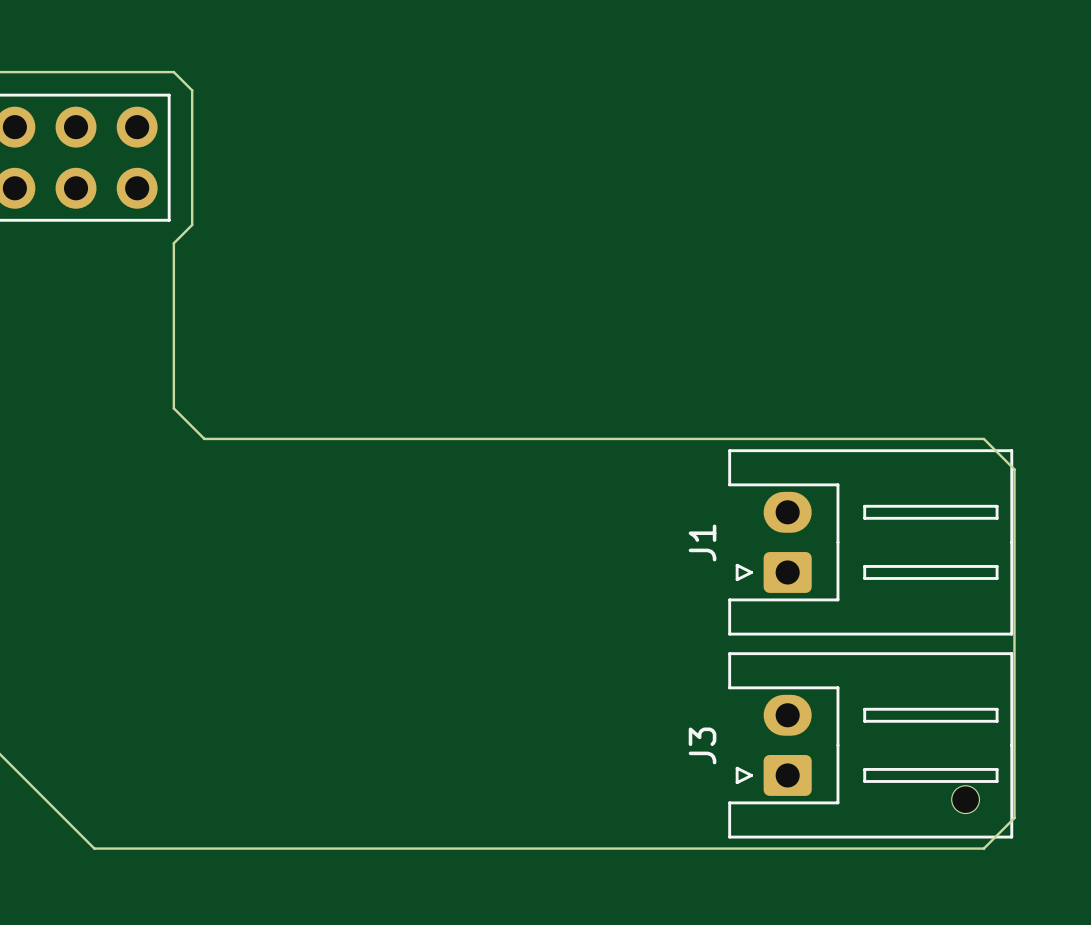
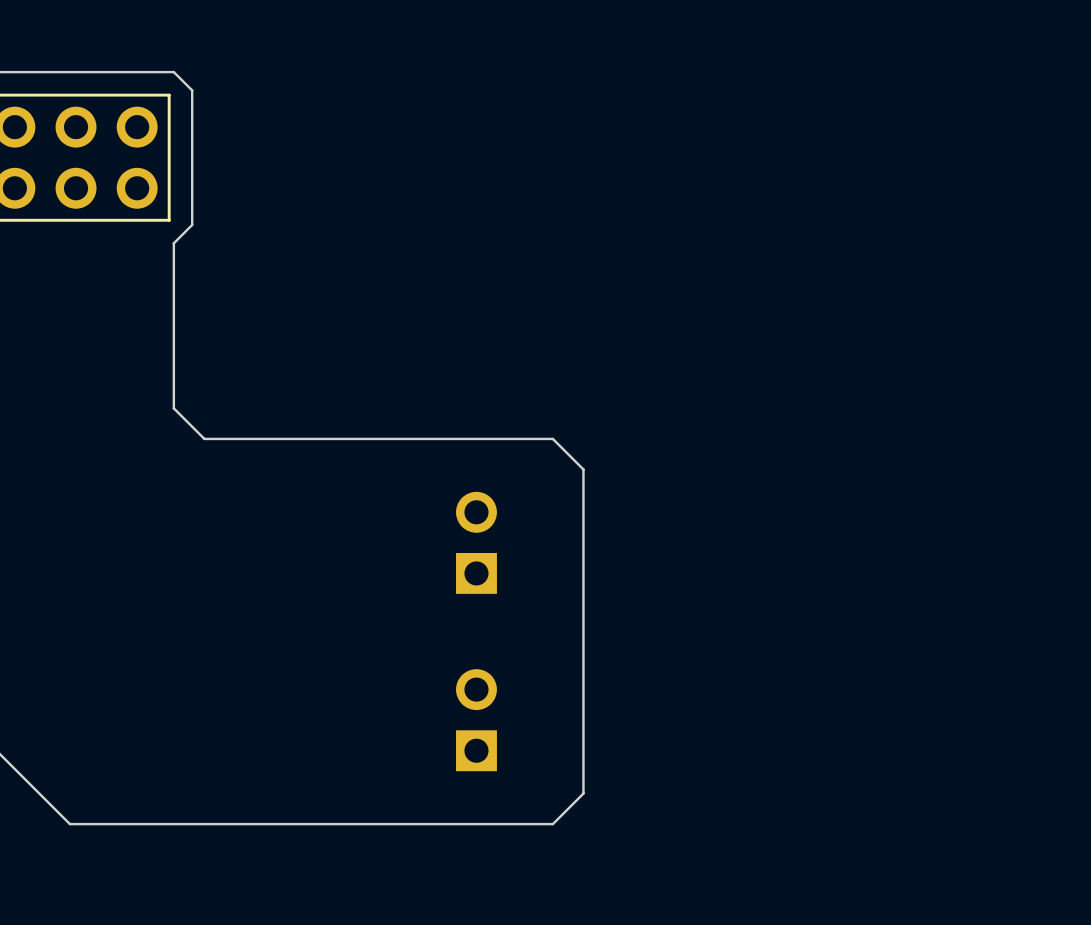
board edge: (552, 438) (983, 438) (1014, 469) (1014, 817) (983, 848) (94, 848) (69, 824) -> (552, 438) (583, 469) (583, 793) (552, 824) (69, 824)
part: none -> (476, 542)
J1: (870, 542) -> none
part: none -> (476, 720)
J3: (870, 745) -> none
part: (965, 799) -> none

